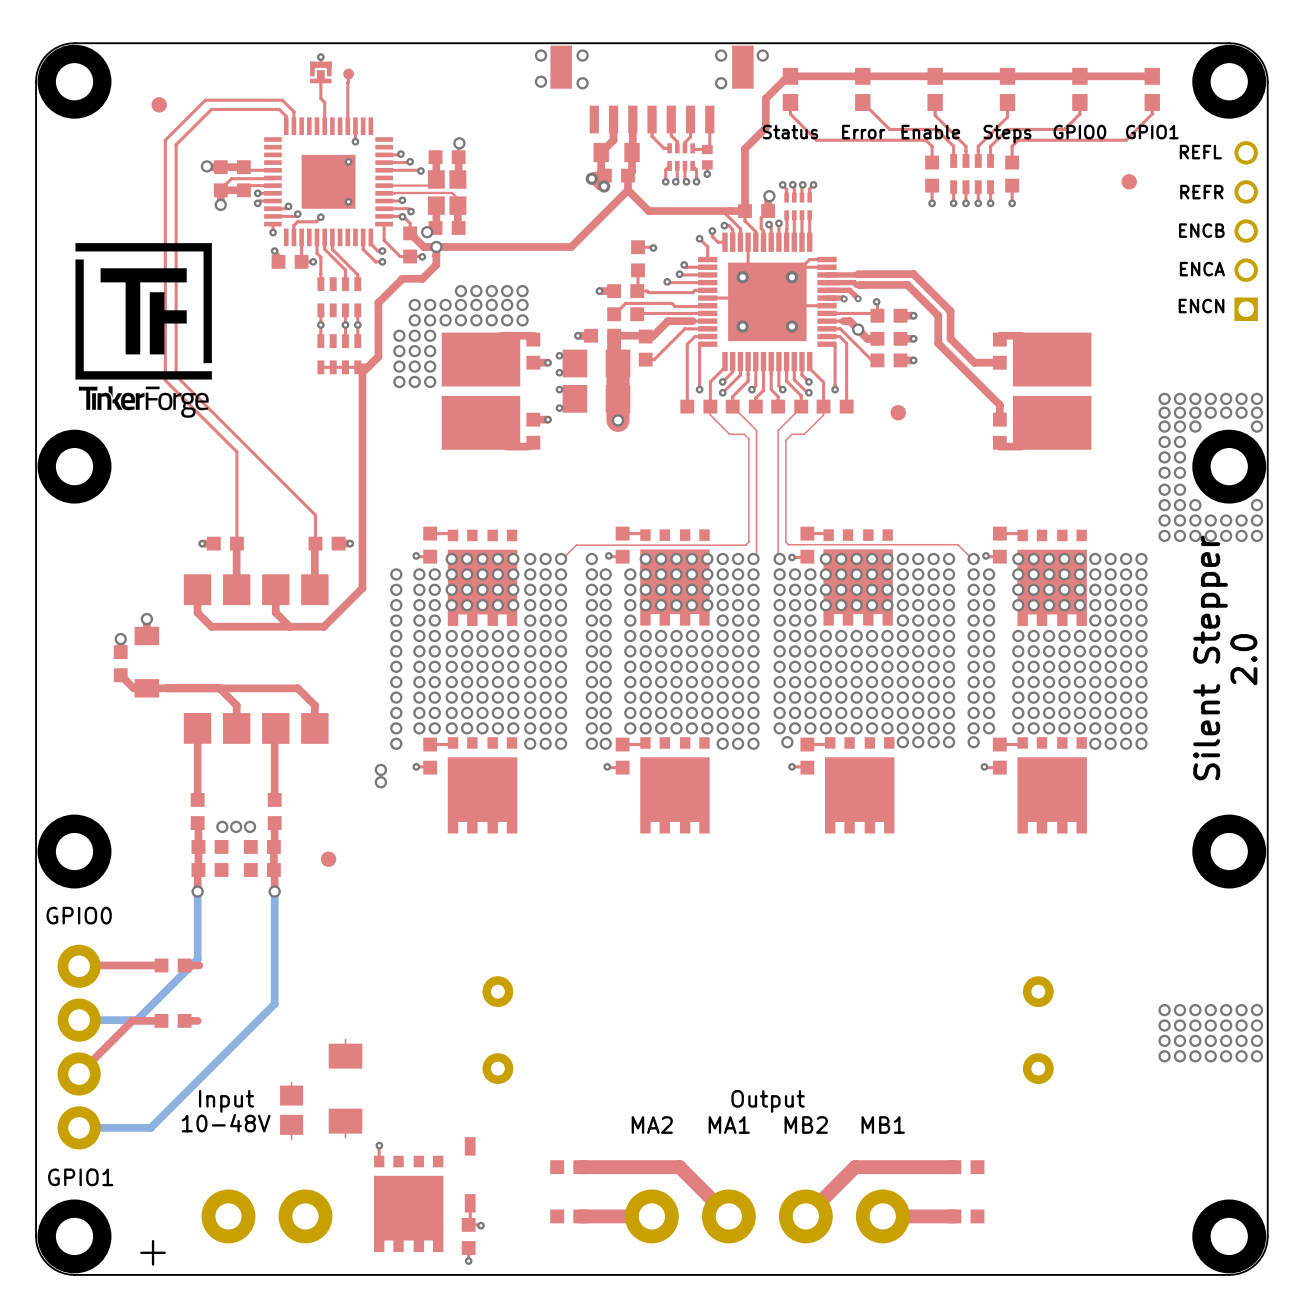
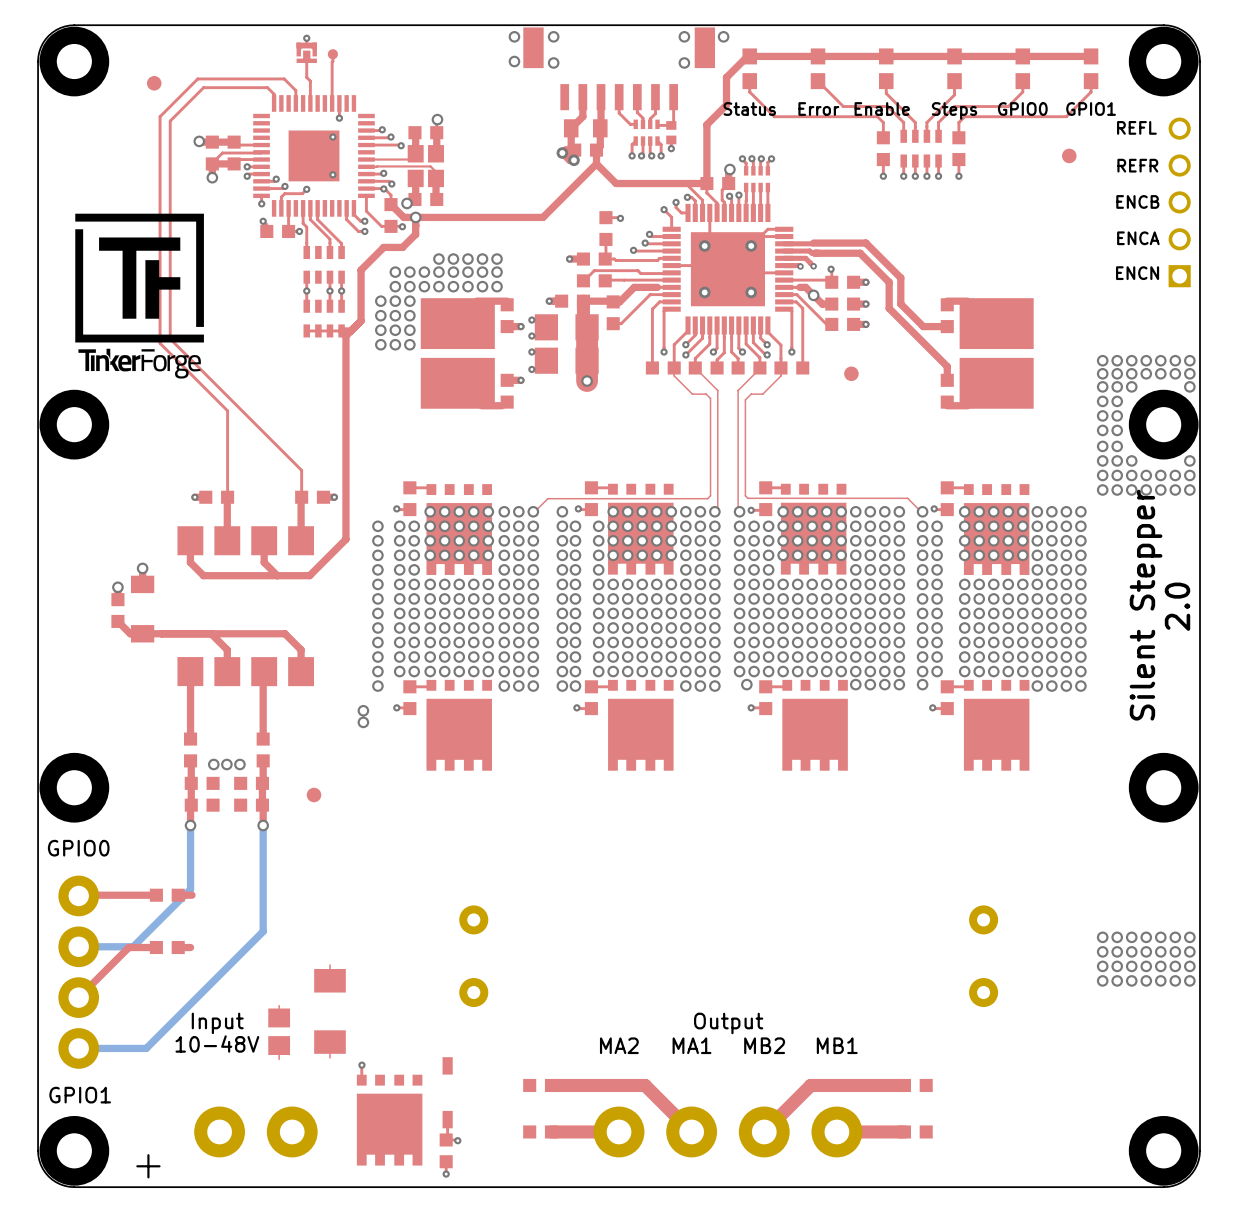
top track: (282, 100) (293, 111) (293, 126) -> (270, 78) (284, 78) (295, 90) (295, 103)

